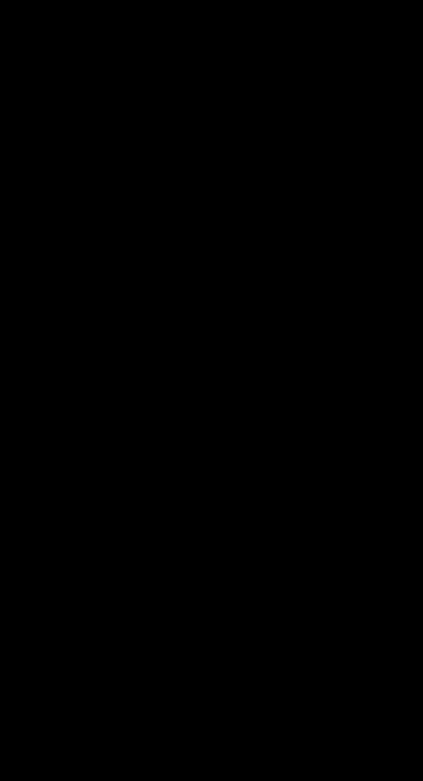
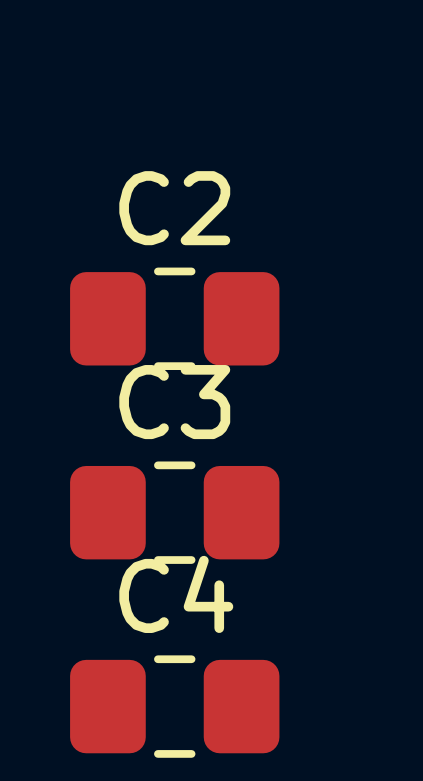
C2: none -> (174, 318)
C3: none -> (174, 512)
C4: none -> (174, 706)

